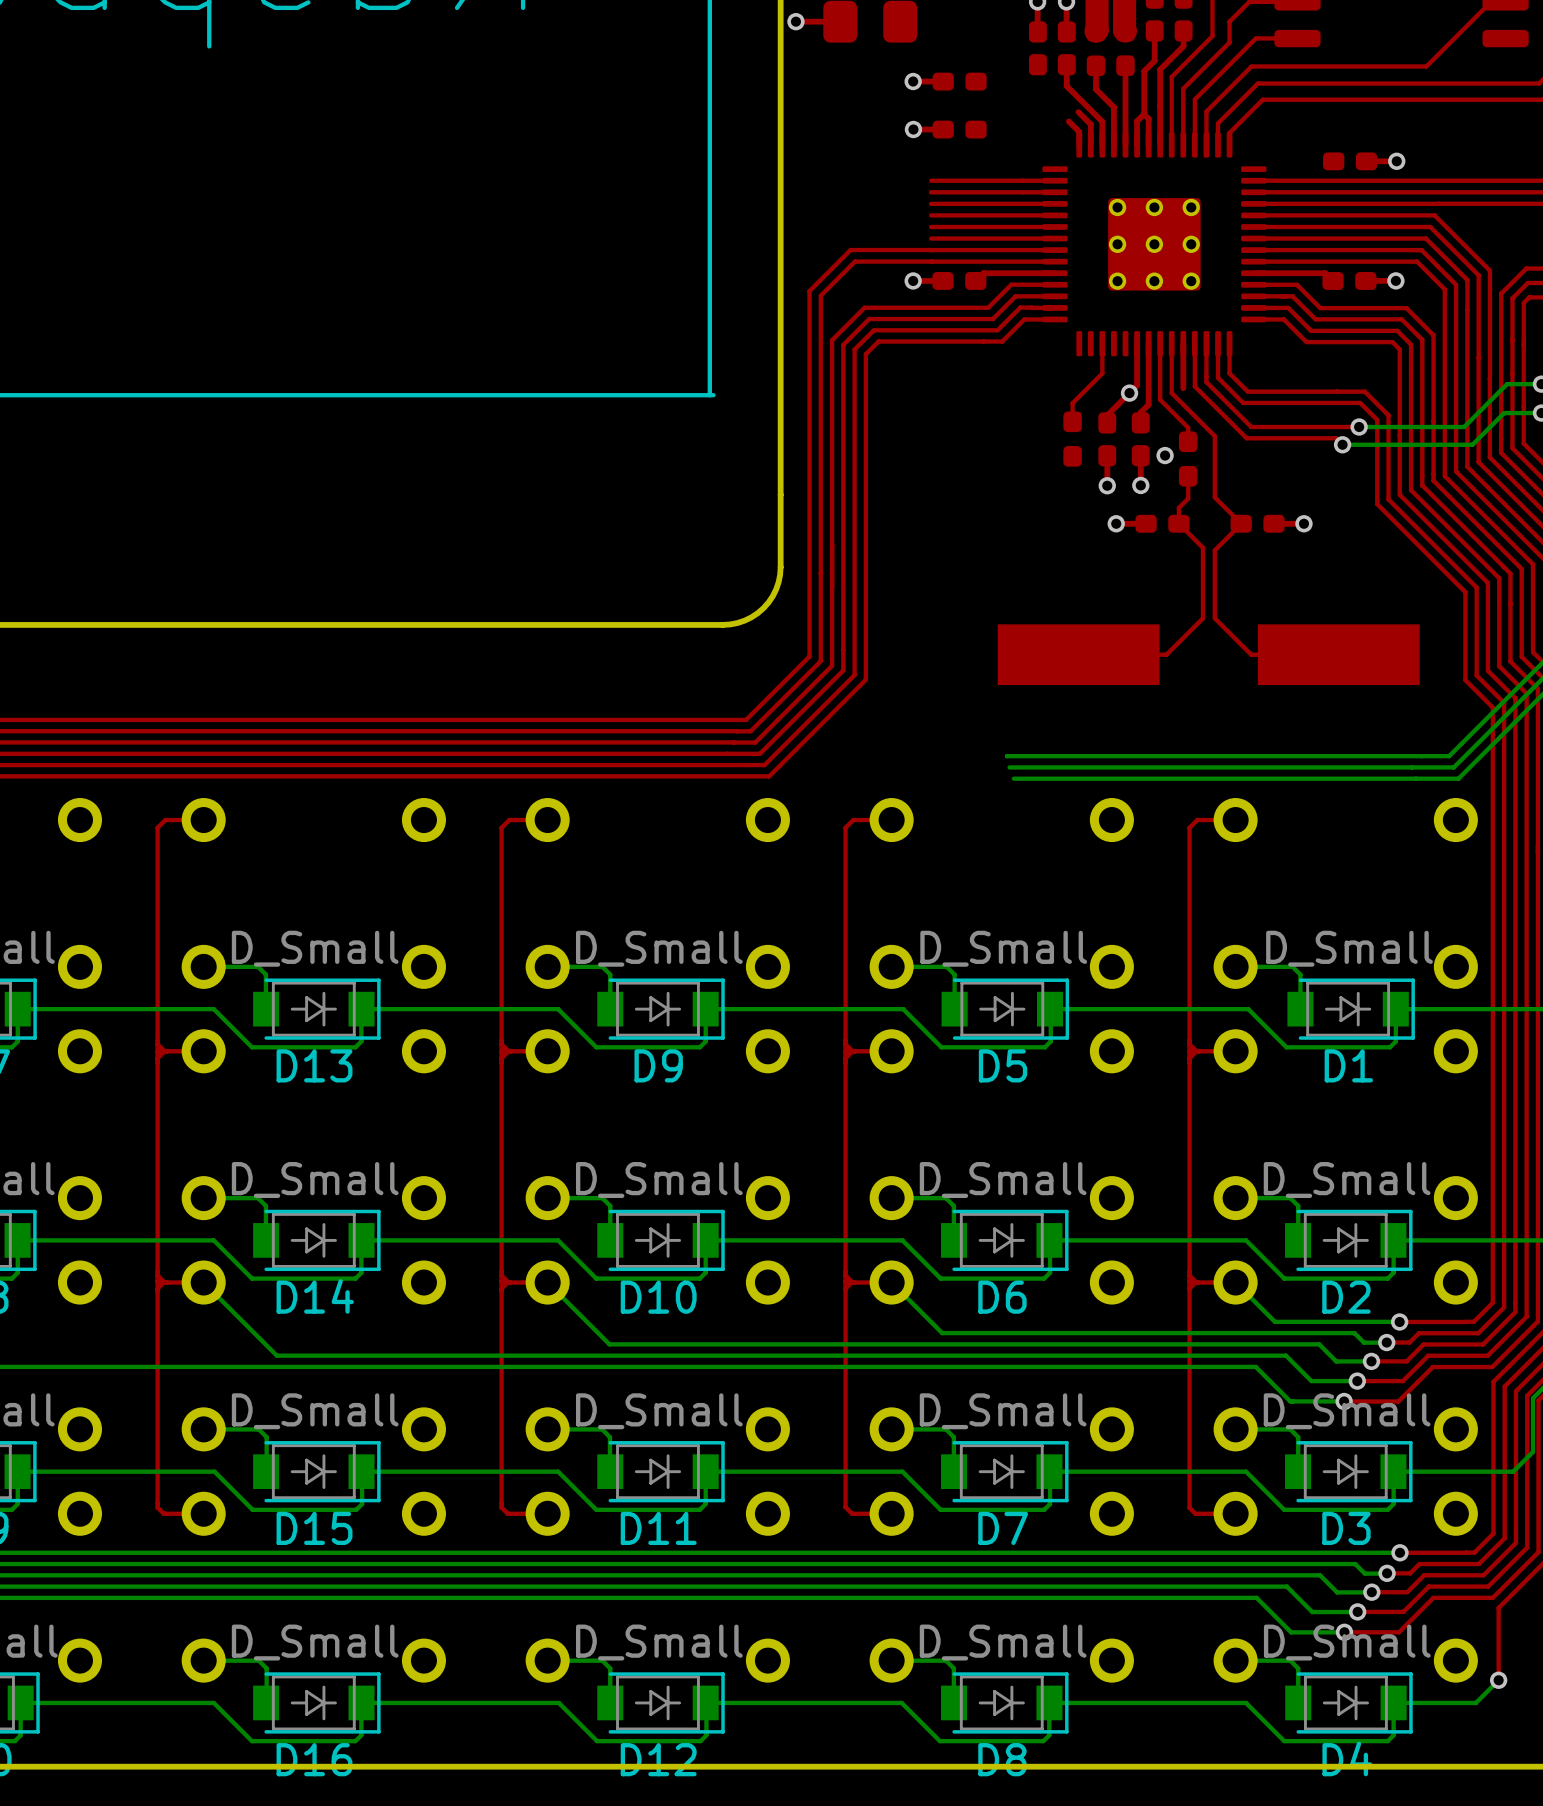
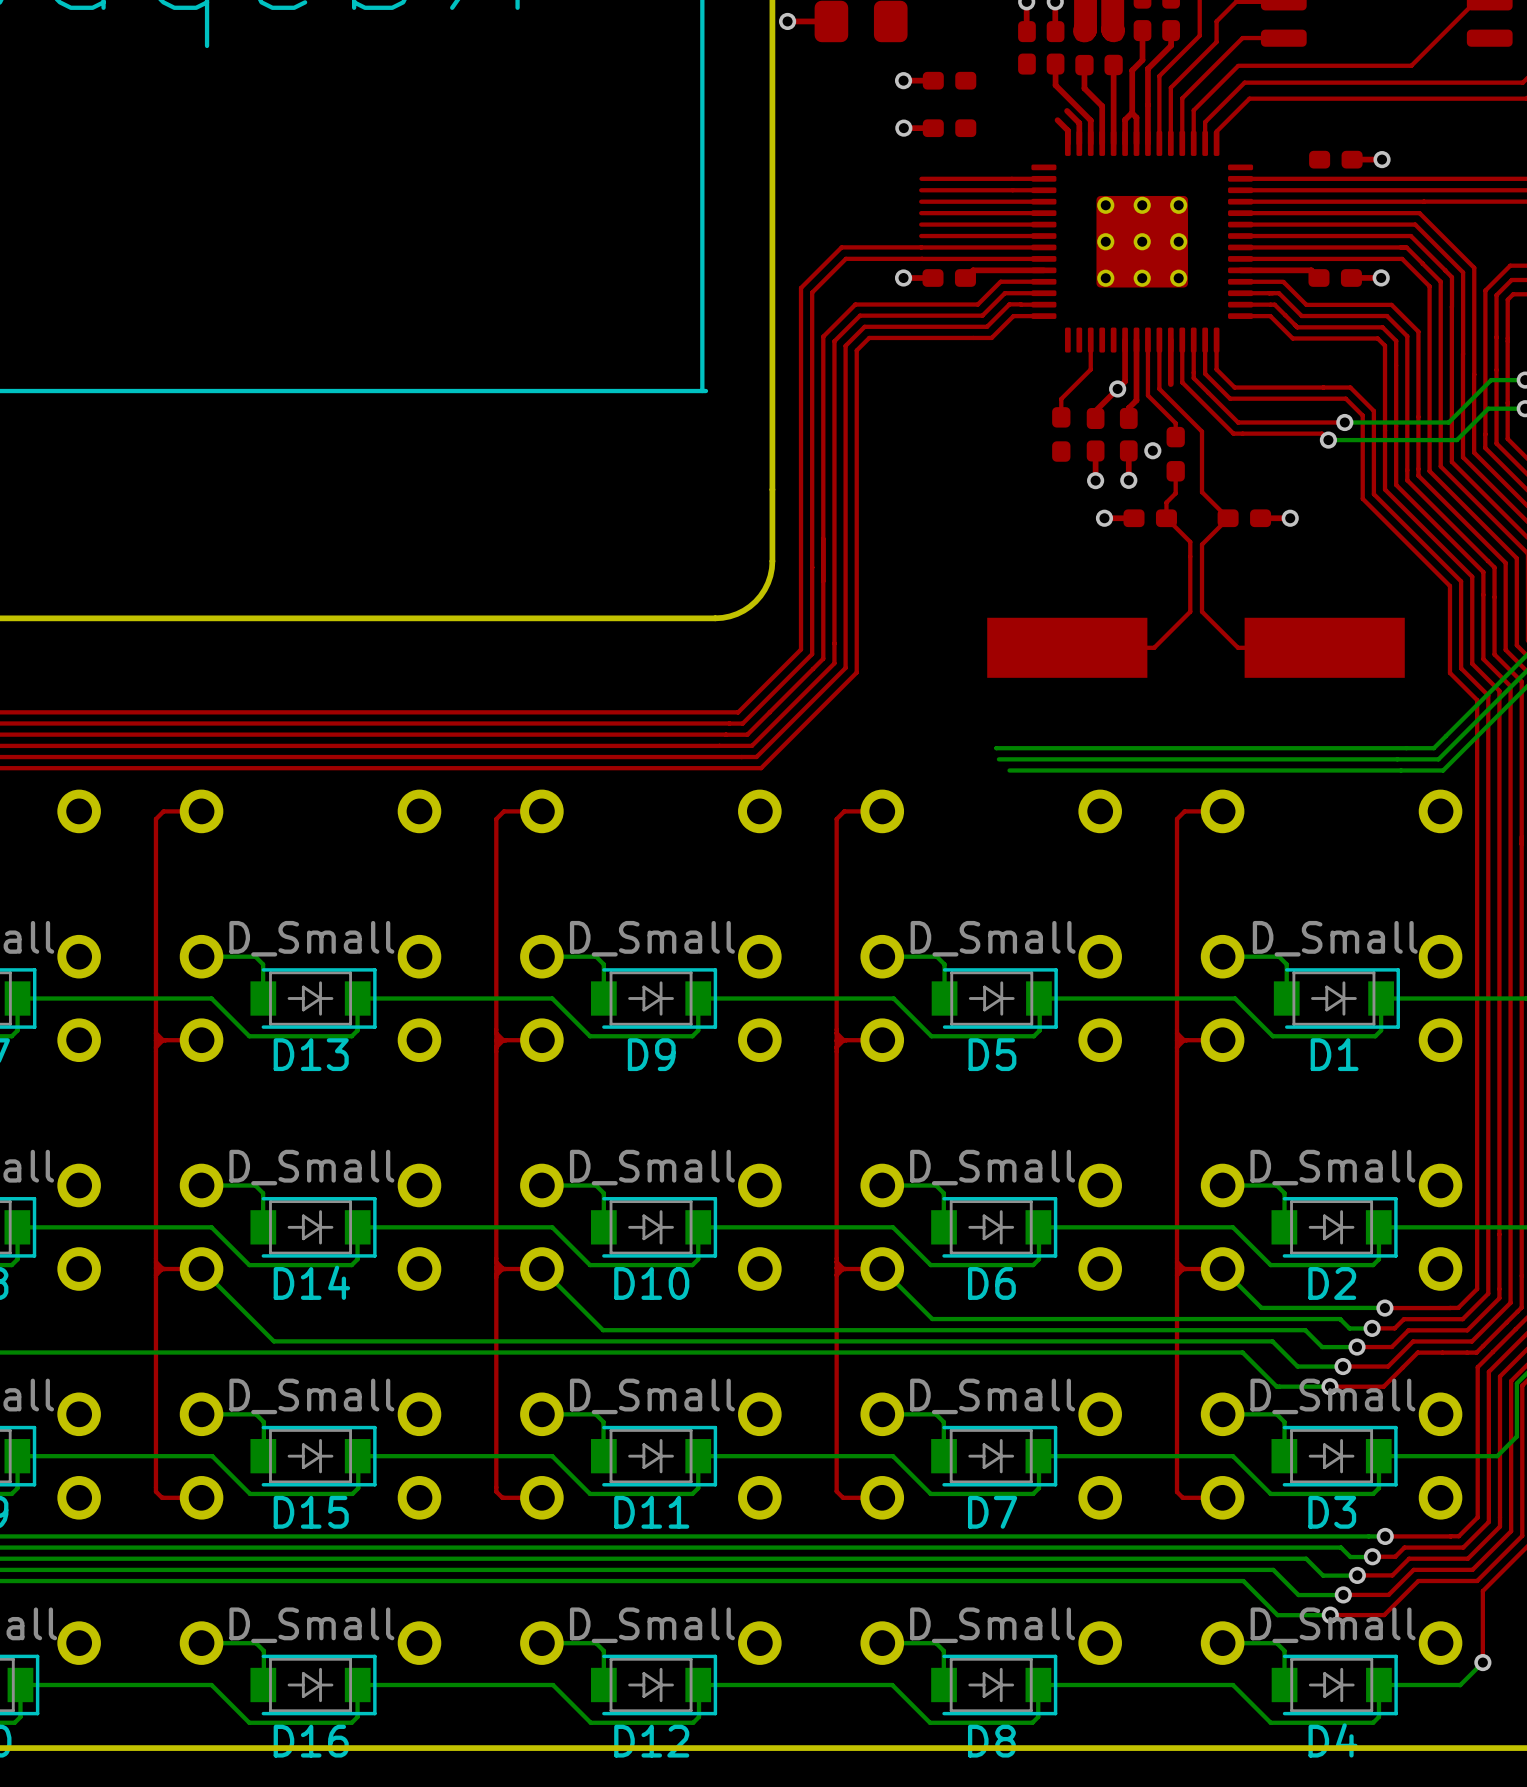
bottom track: (1020, 778) (1013, 778) -> none

